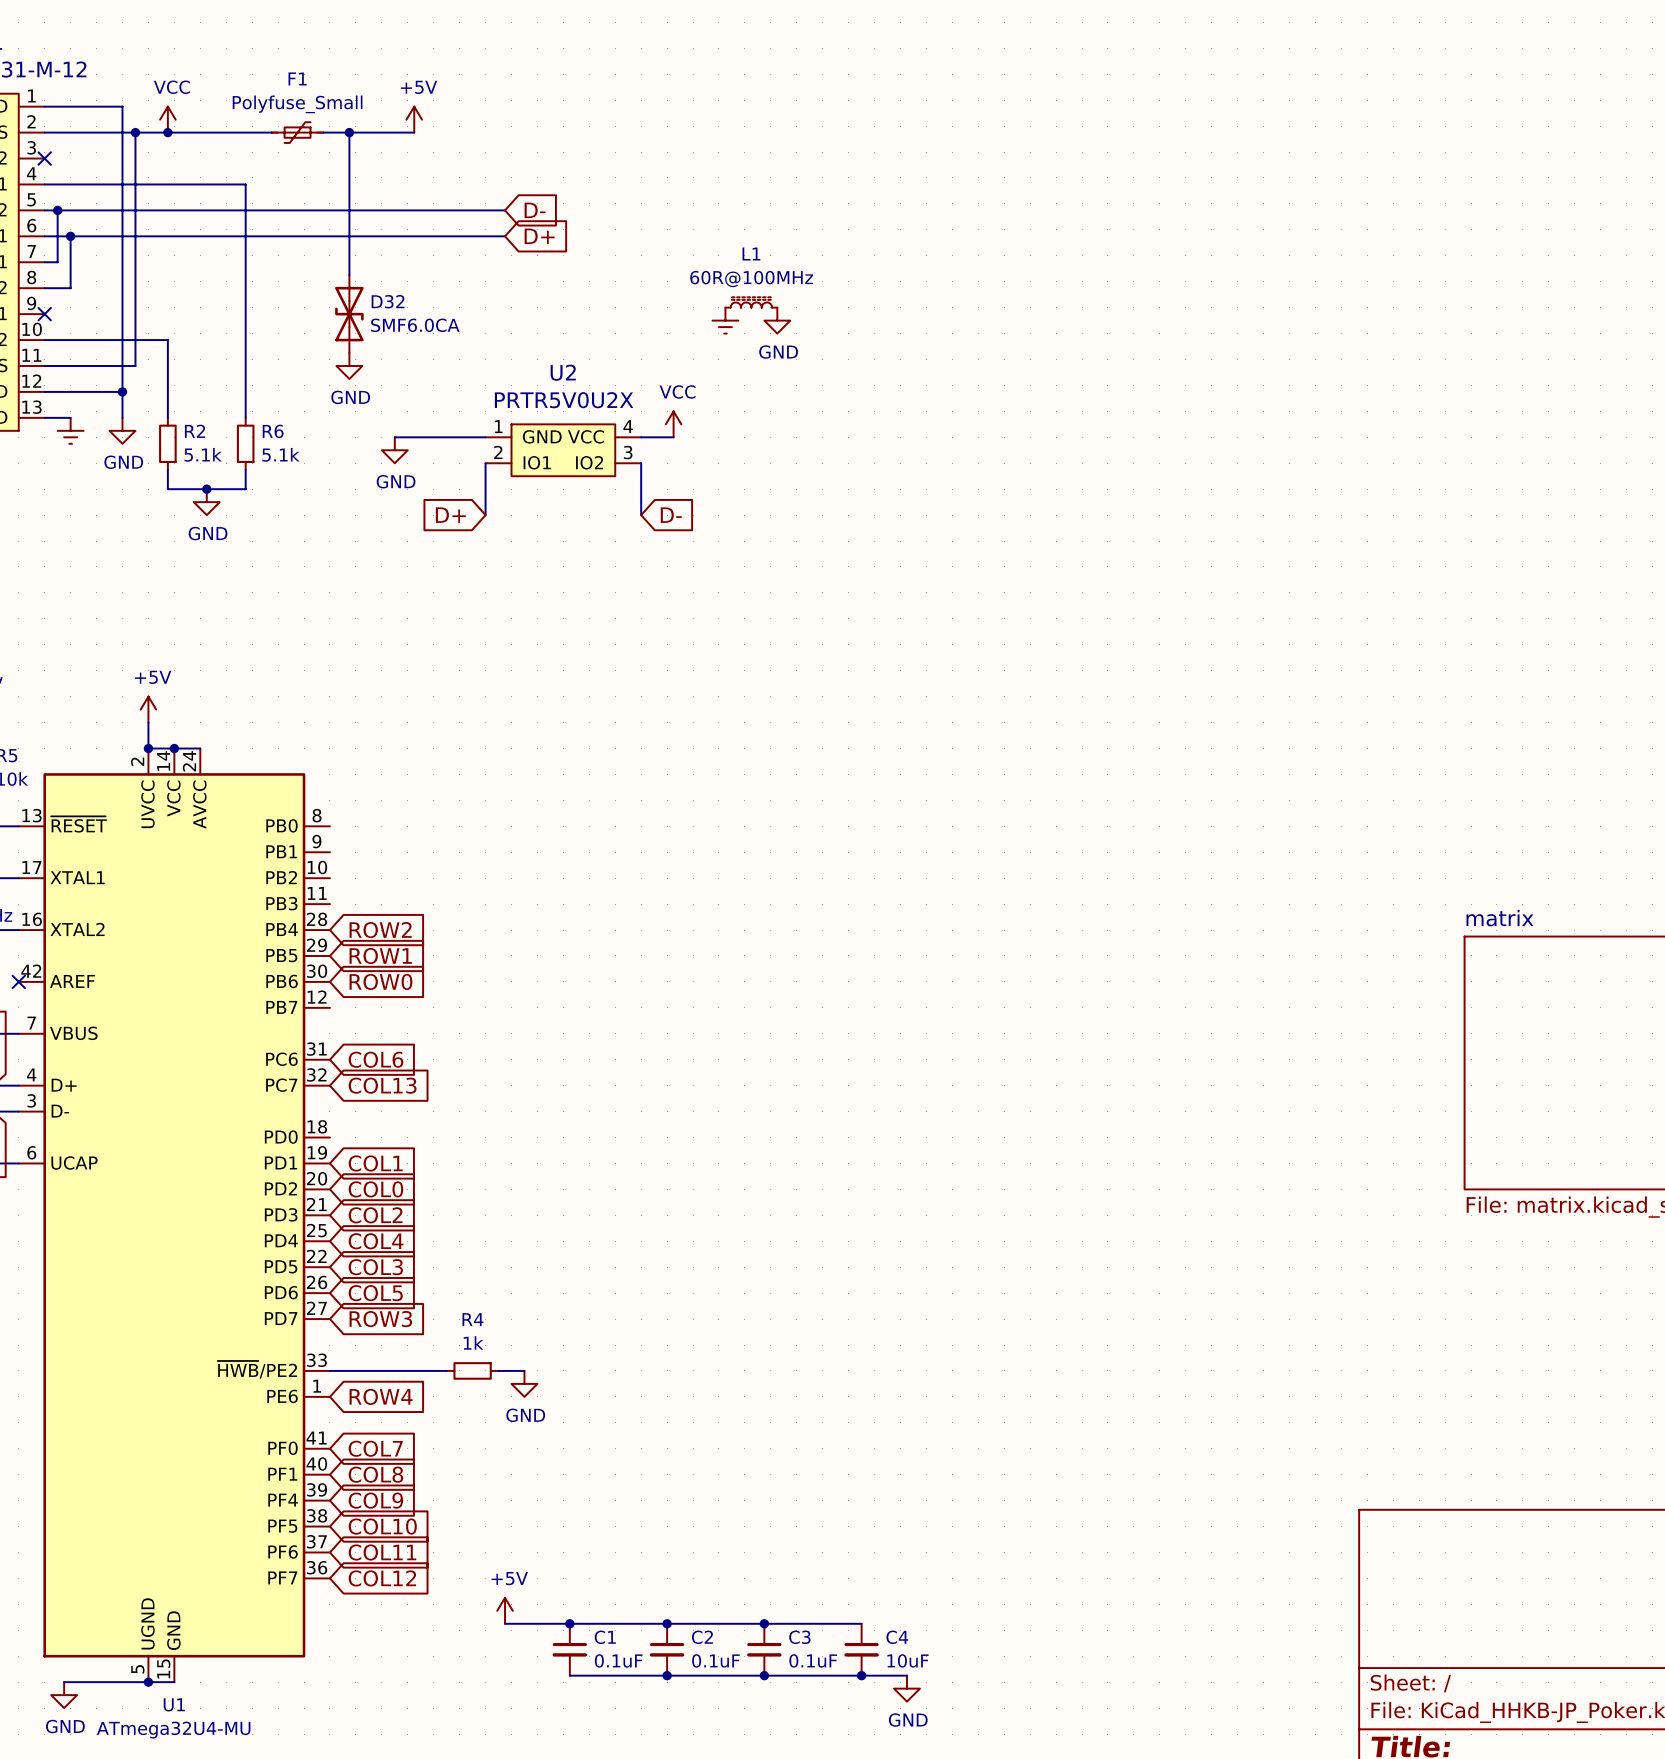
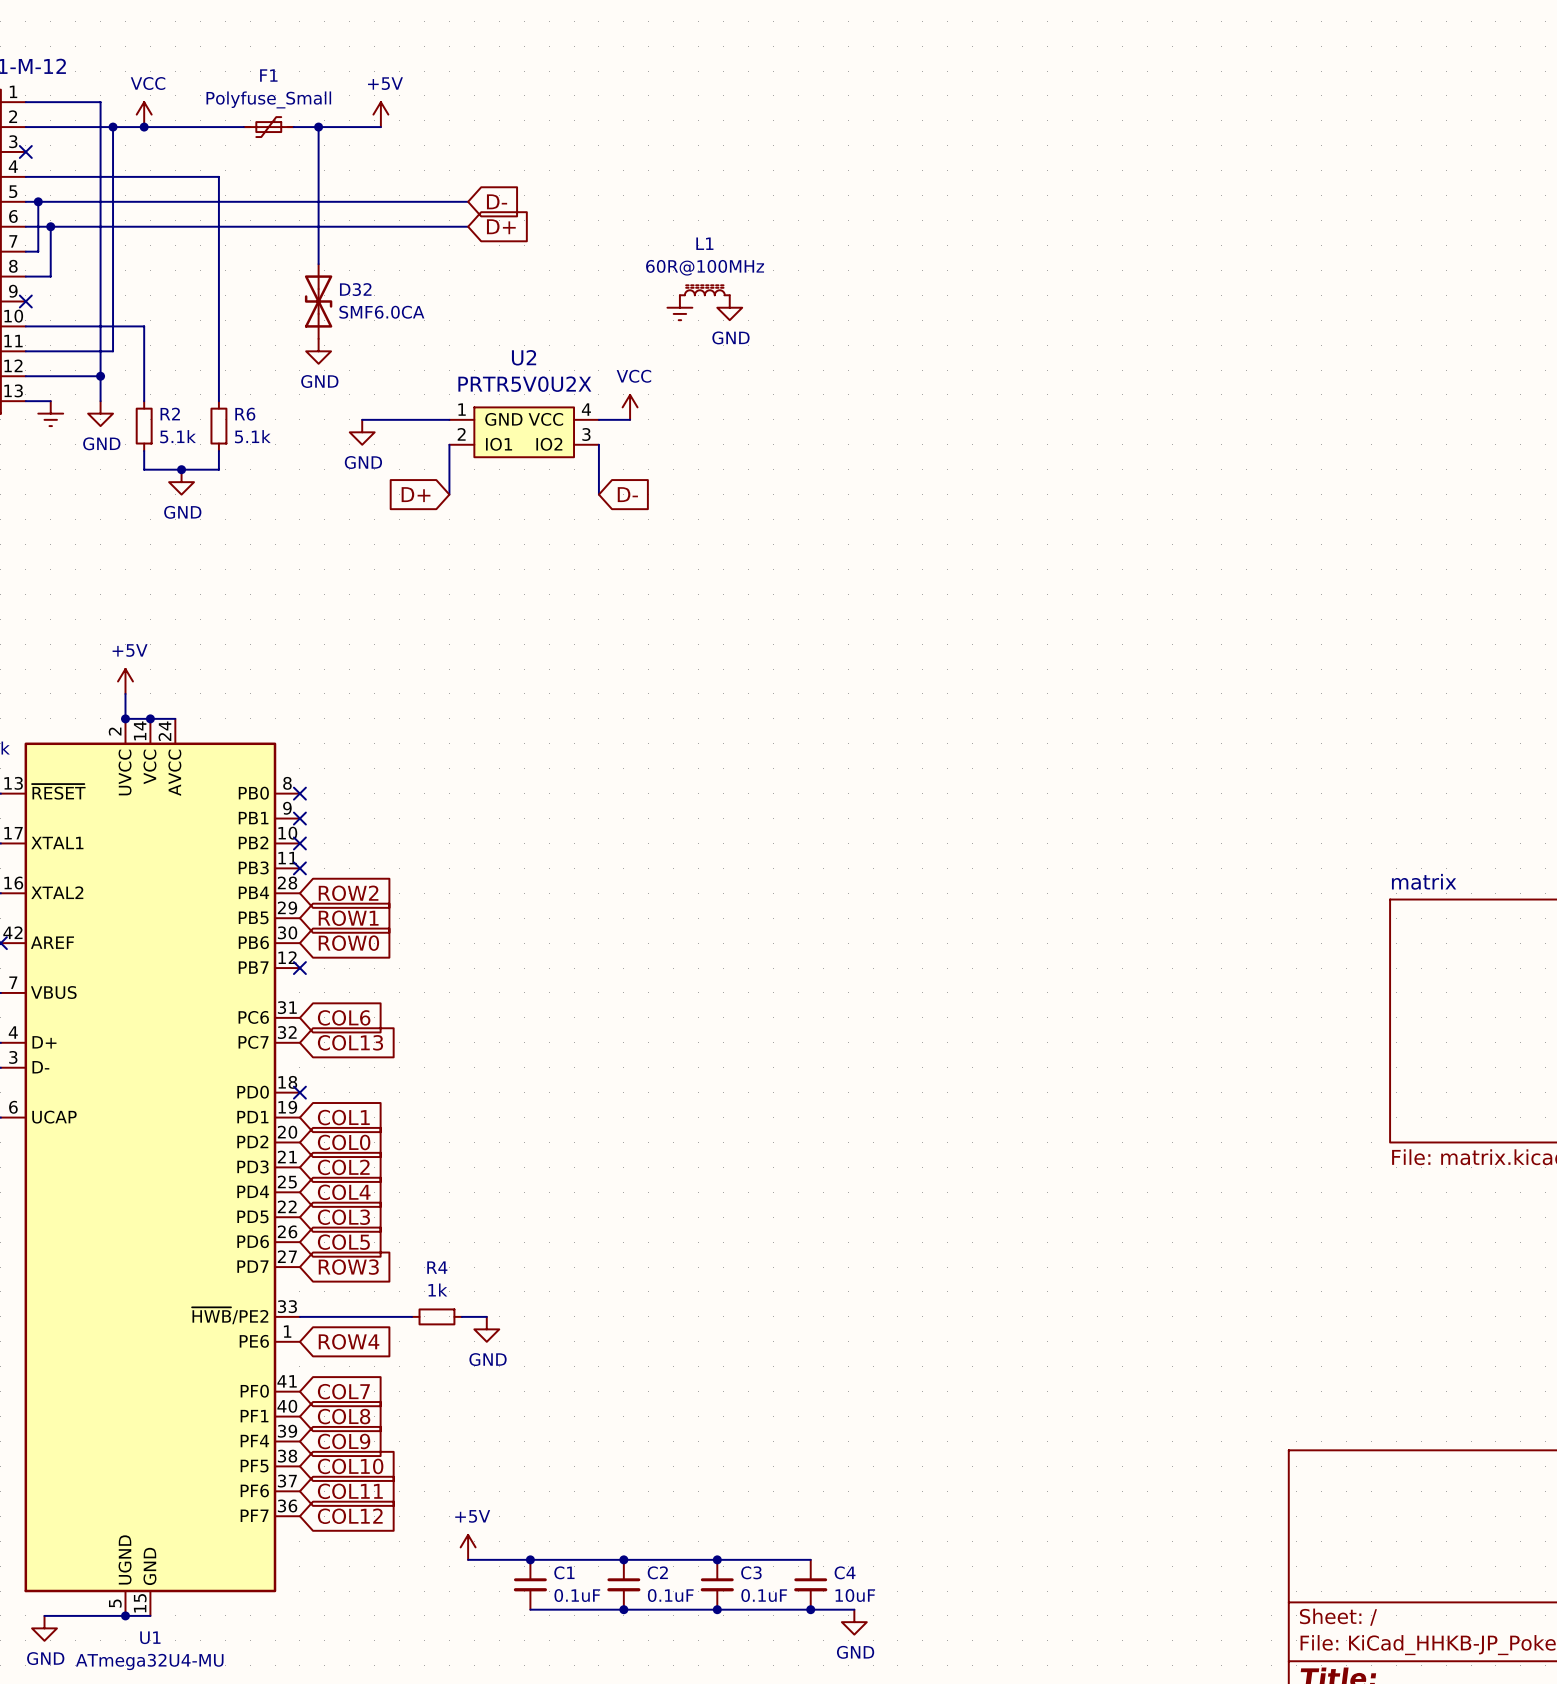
no-connect mark: none -> (299, 793)
no-connect mark: none -> (299, 818)
no-connect mark: none -> (299, 843)
no-connect mark: none -> (299, 868)
no-connect mark: none -> (299, 968)
no-connect mark: none -> (299, 1092)

